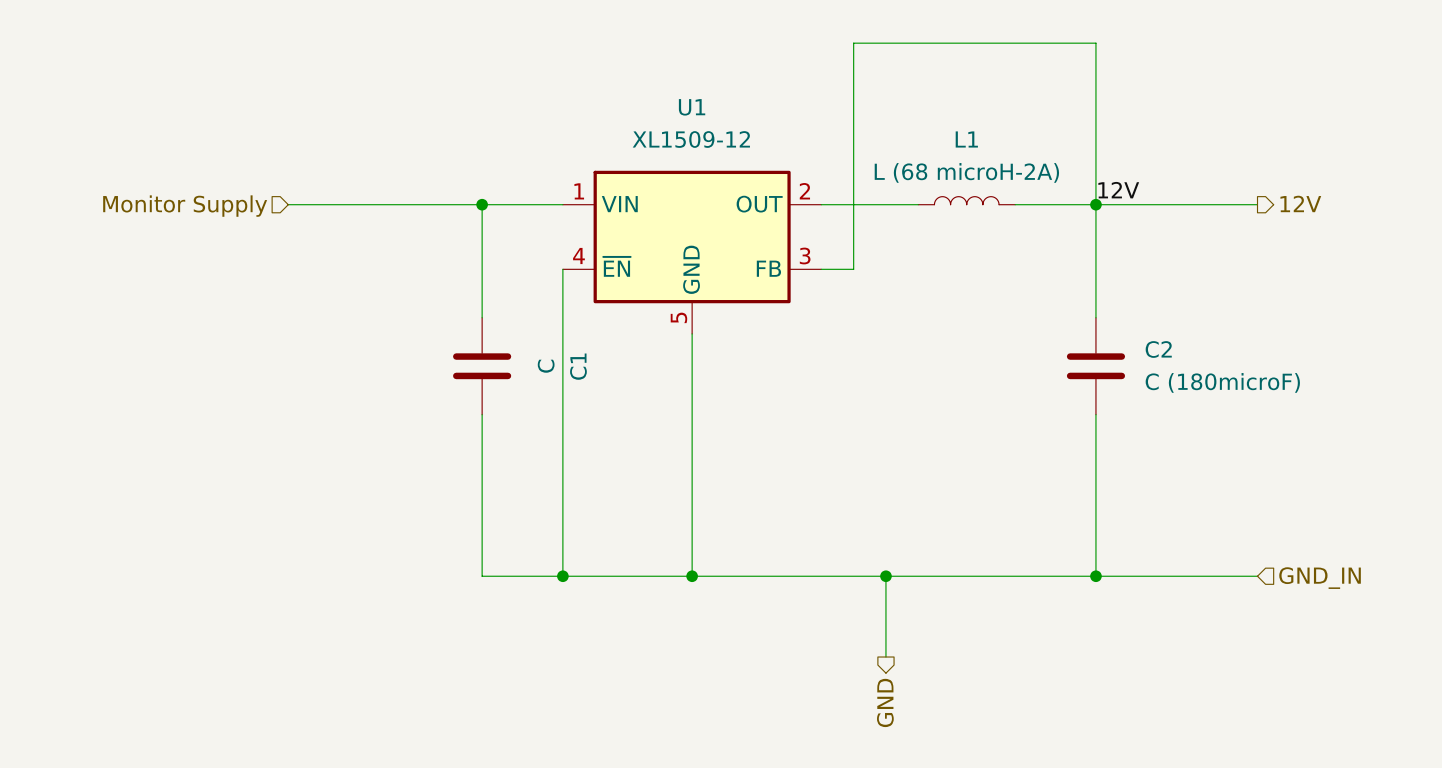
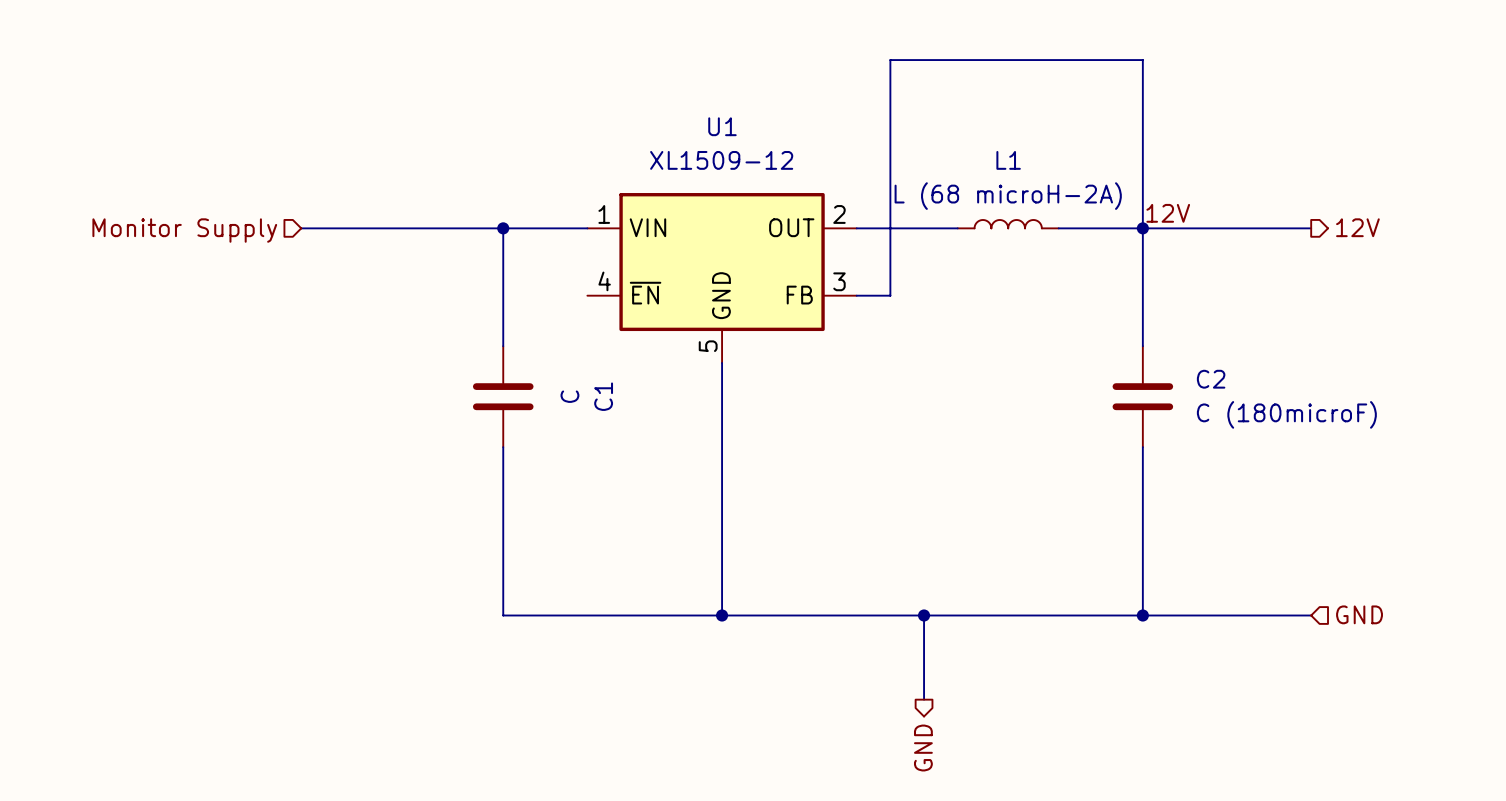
wire: (562, 269) (562, 576) -> none
junction: (562, 576) -> none
hierarchical label: GND_IN (1320, 578) -> GND (1359, 614)

